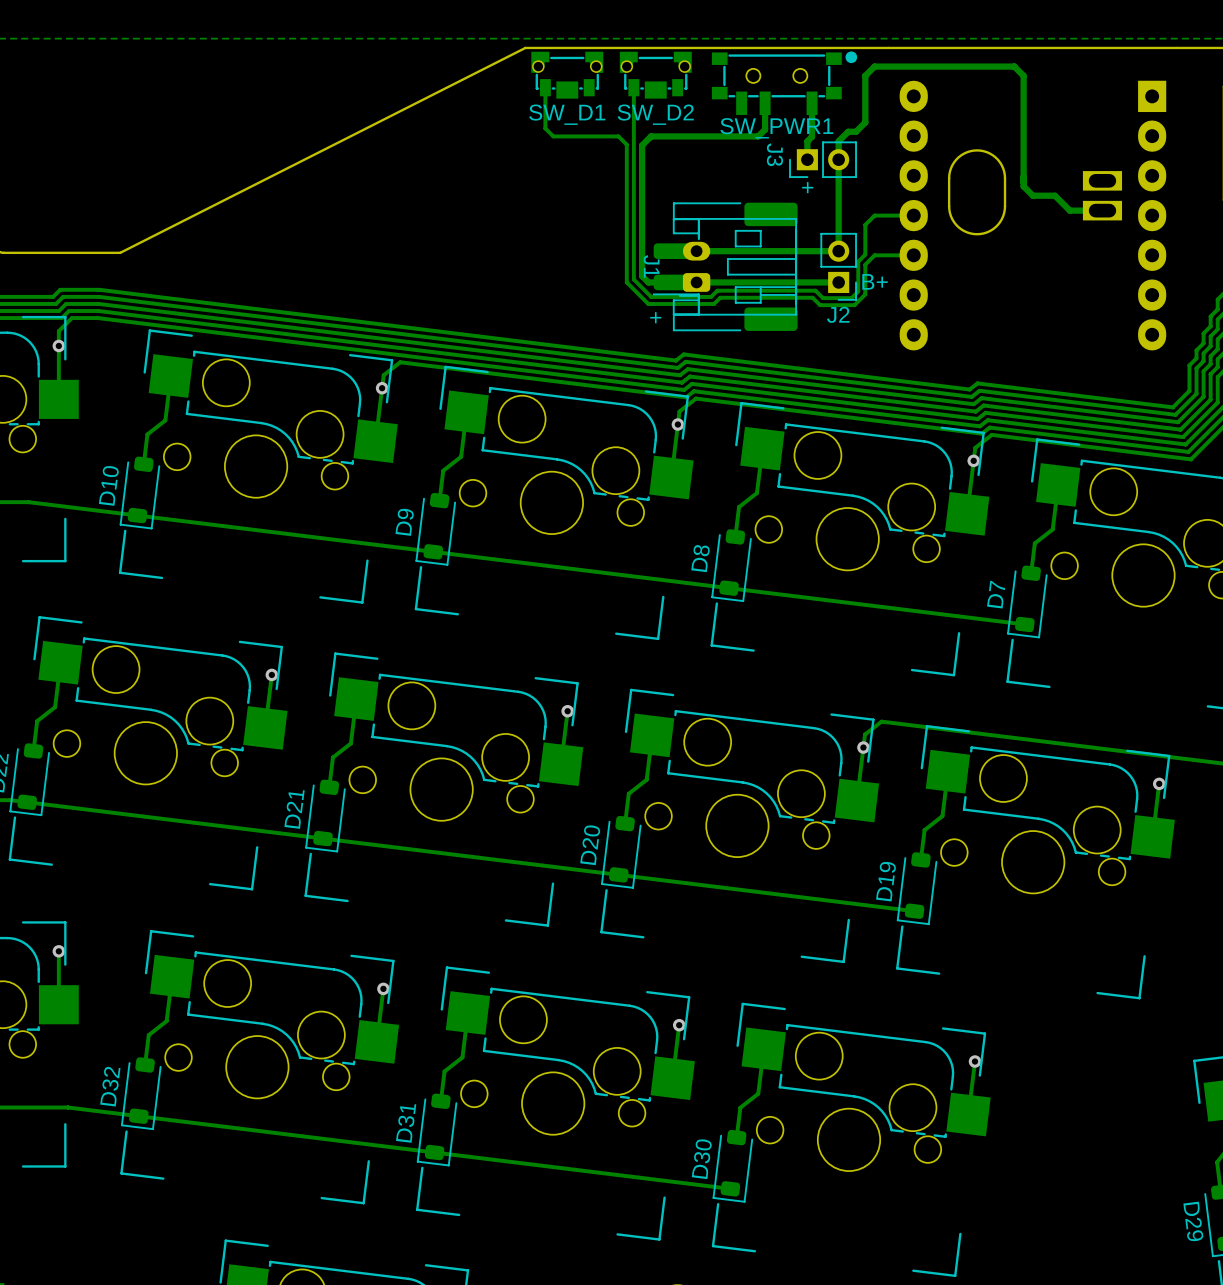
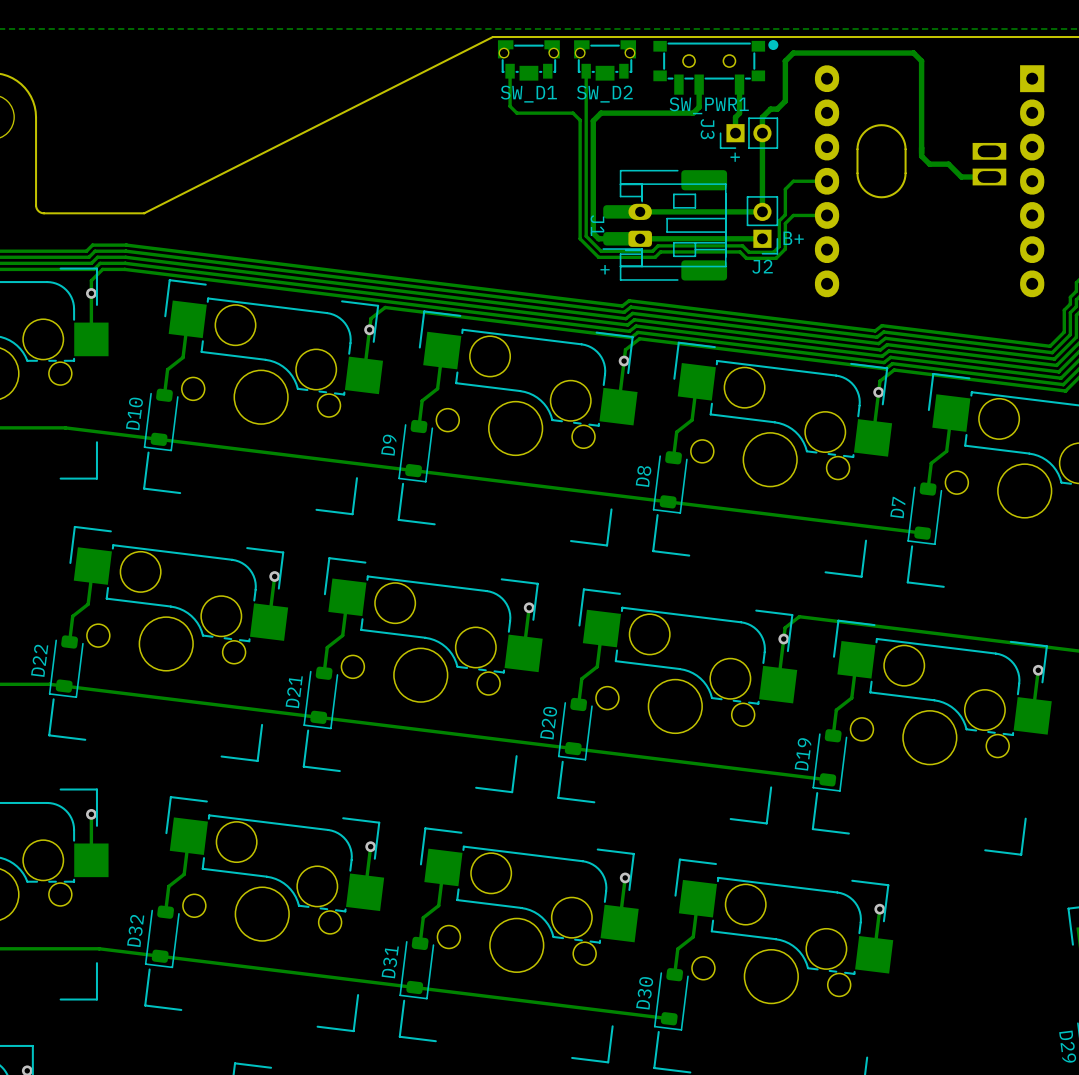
J1 name: none -> J1 (597, 225)
text: J1 (651, 266) -> none

